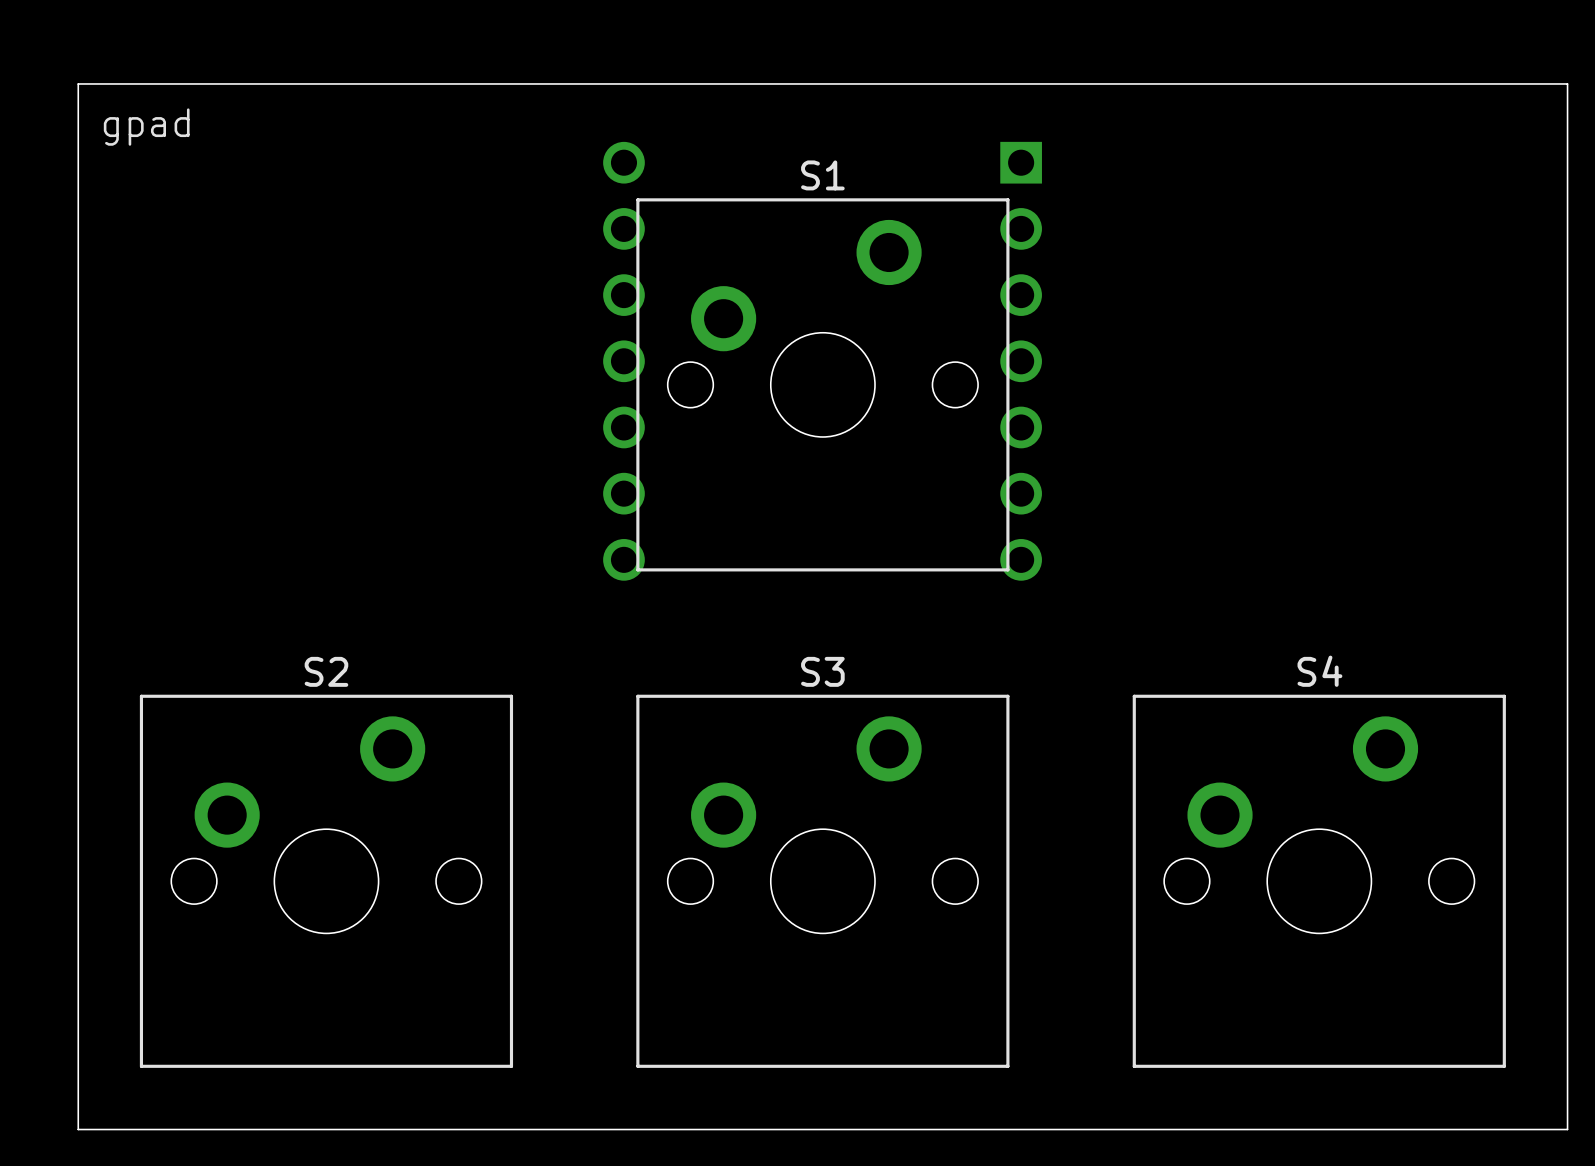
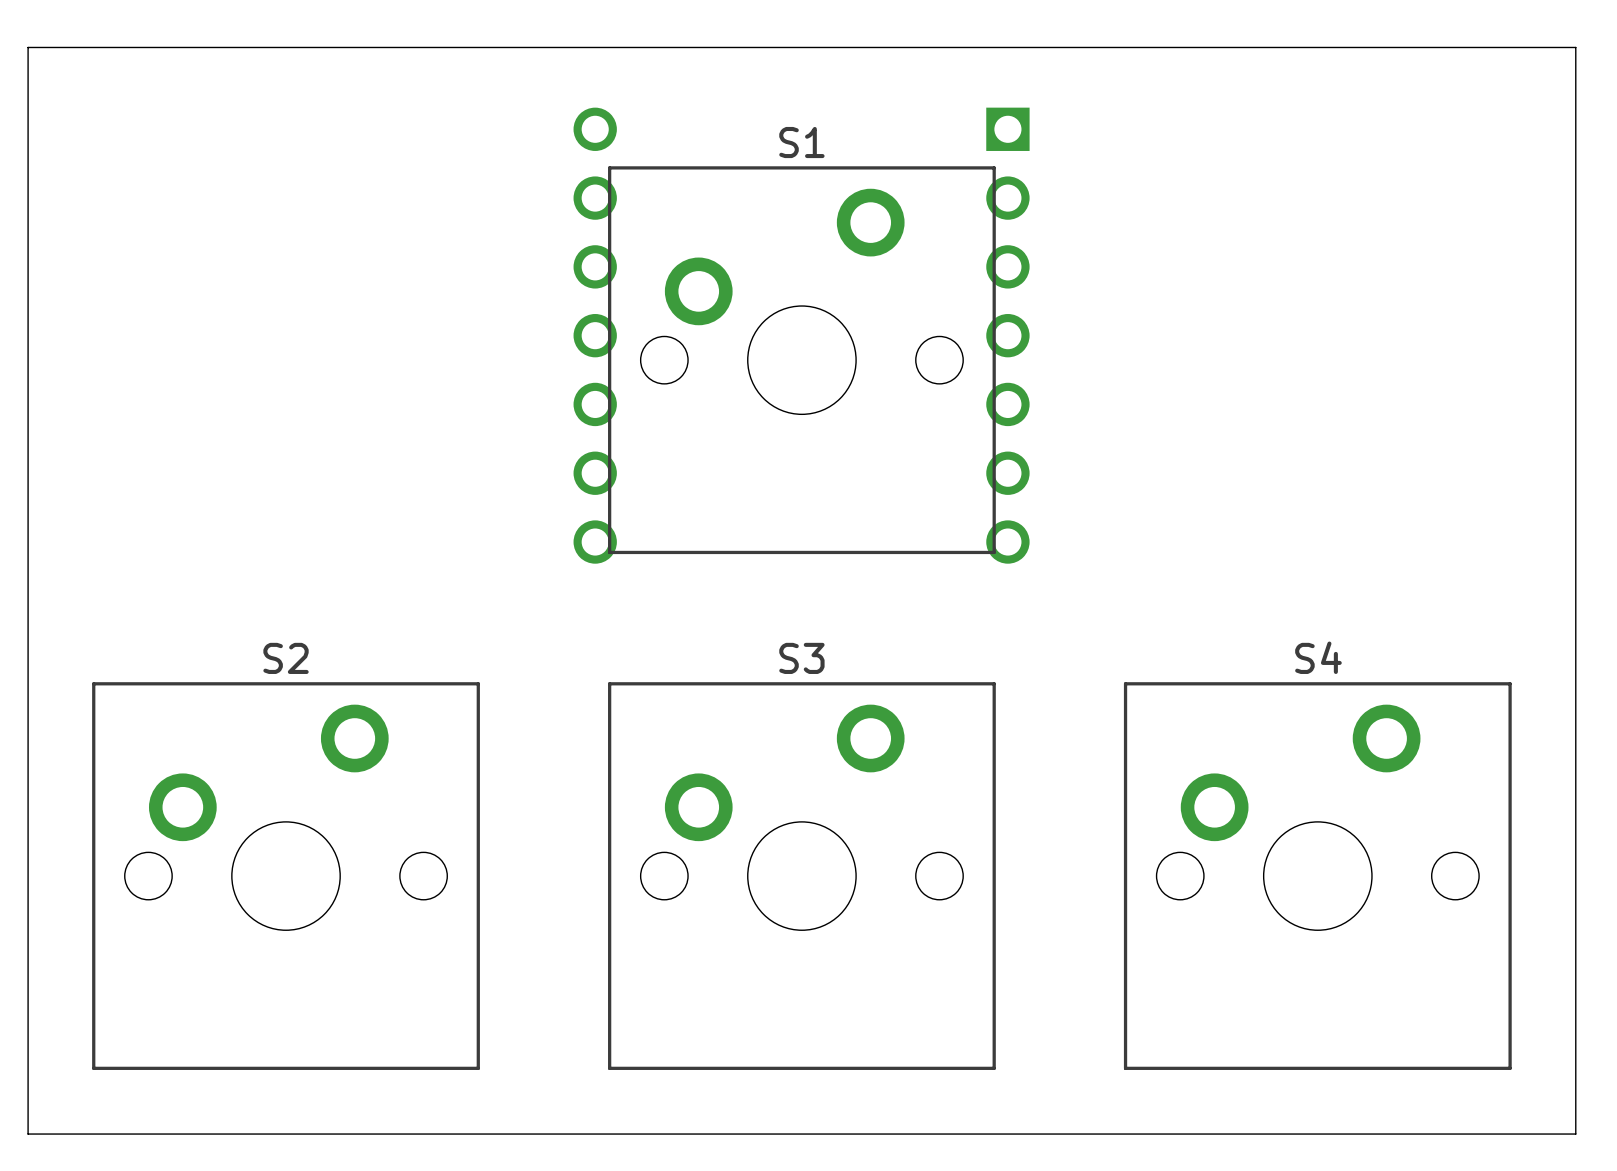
text: gpad (146, 127) -> none

